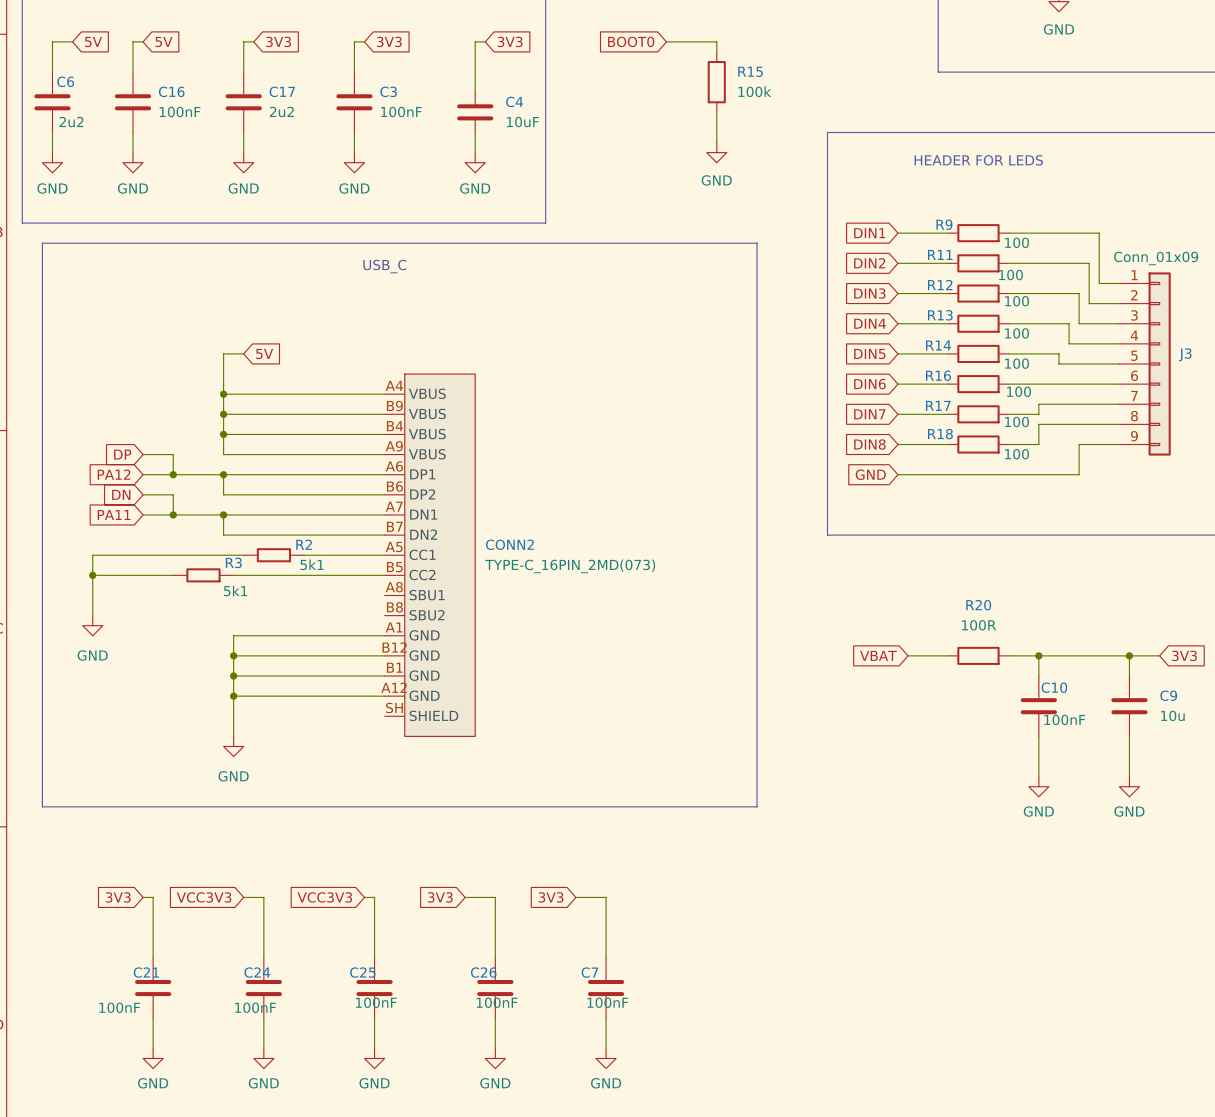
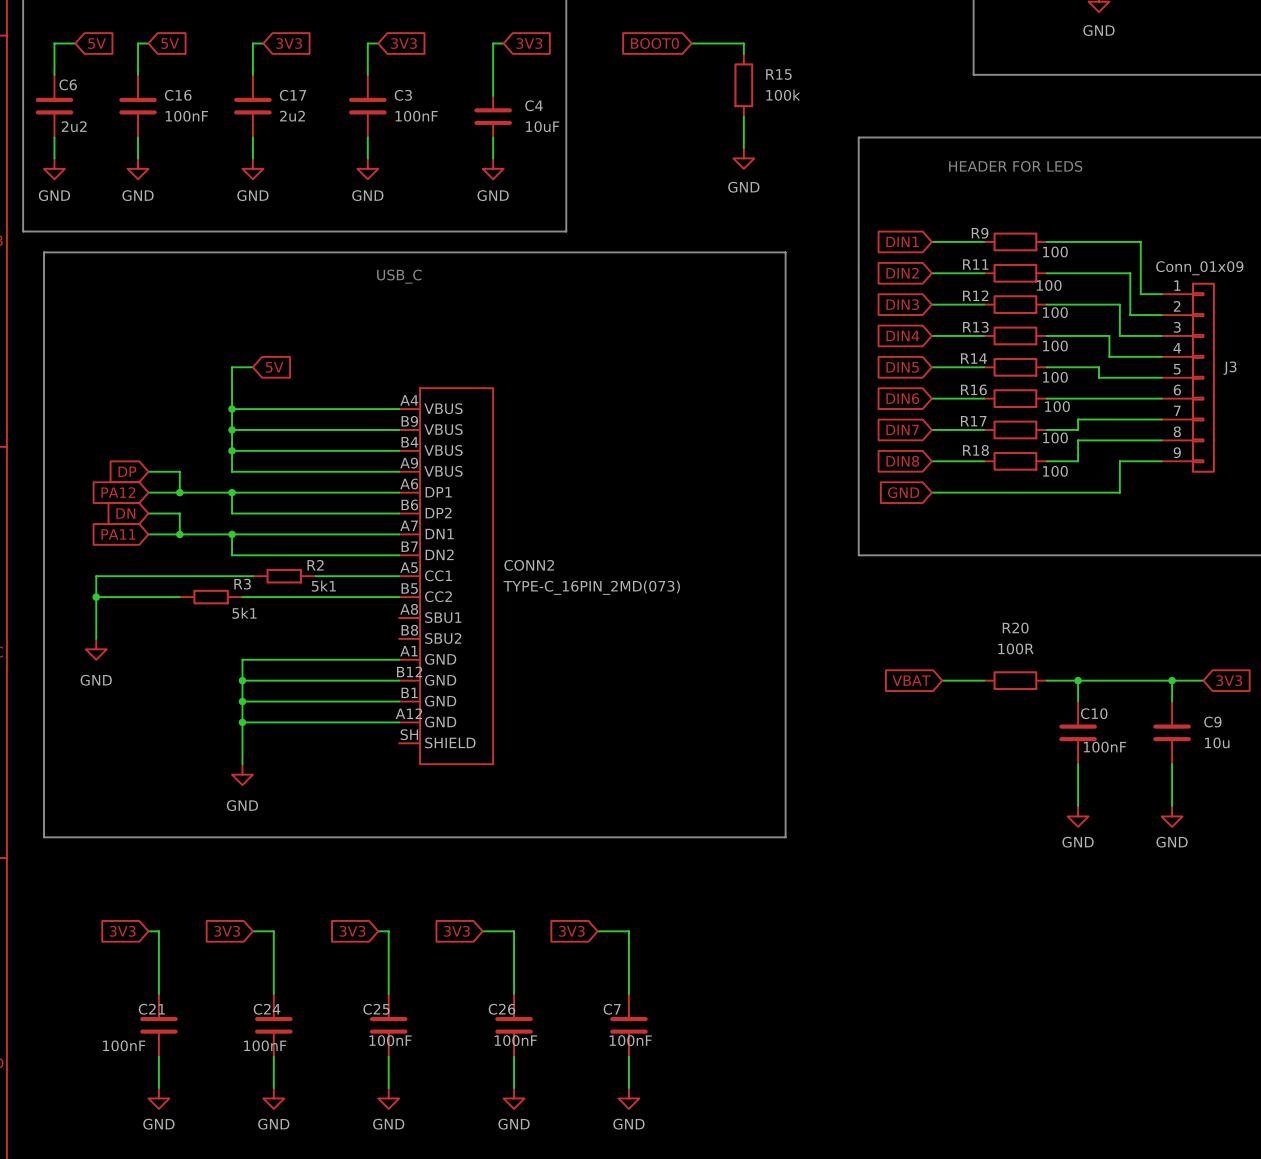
global label: VCC3V3 (204, 897) -> 3V3 (227, 931)
global label: VCC3V3 (324, 897) -> 3V3 (352, 931)

